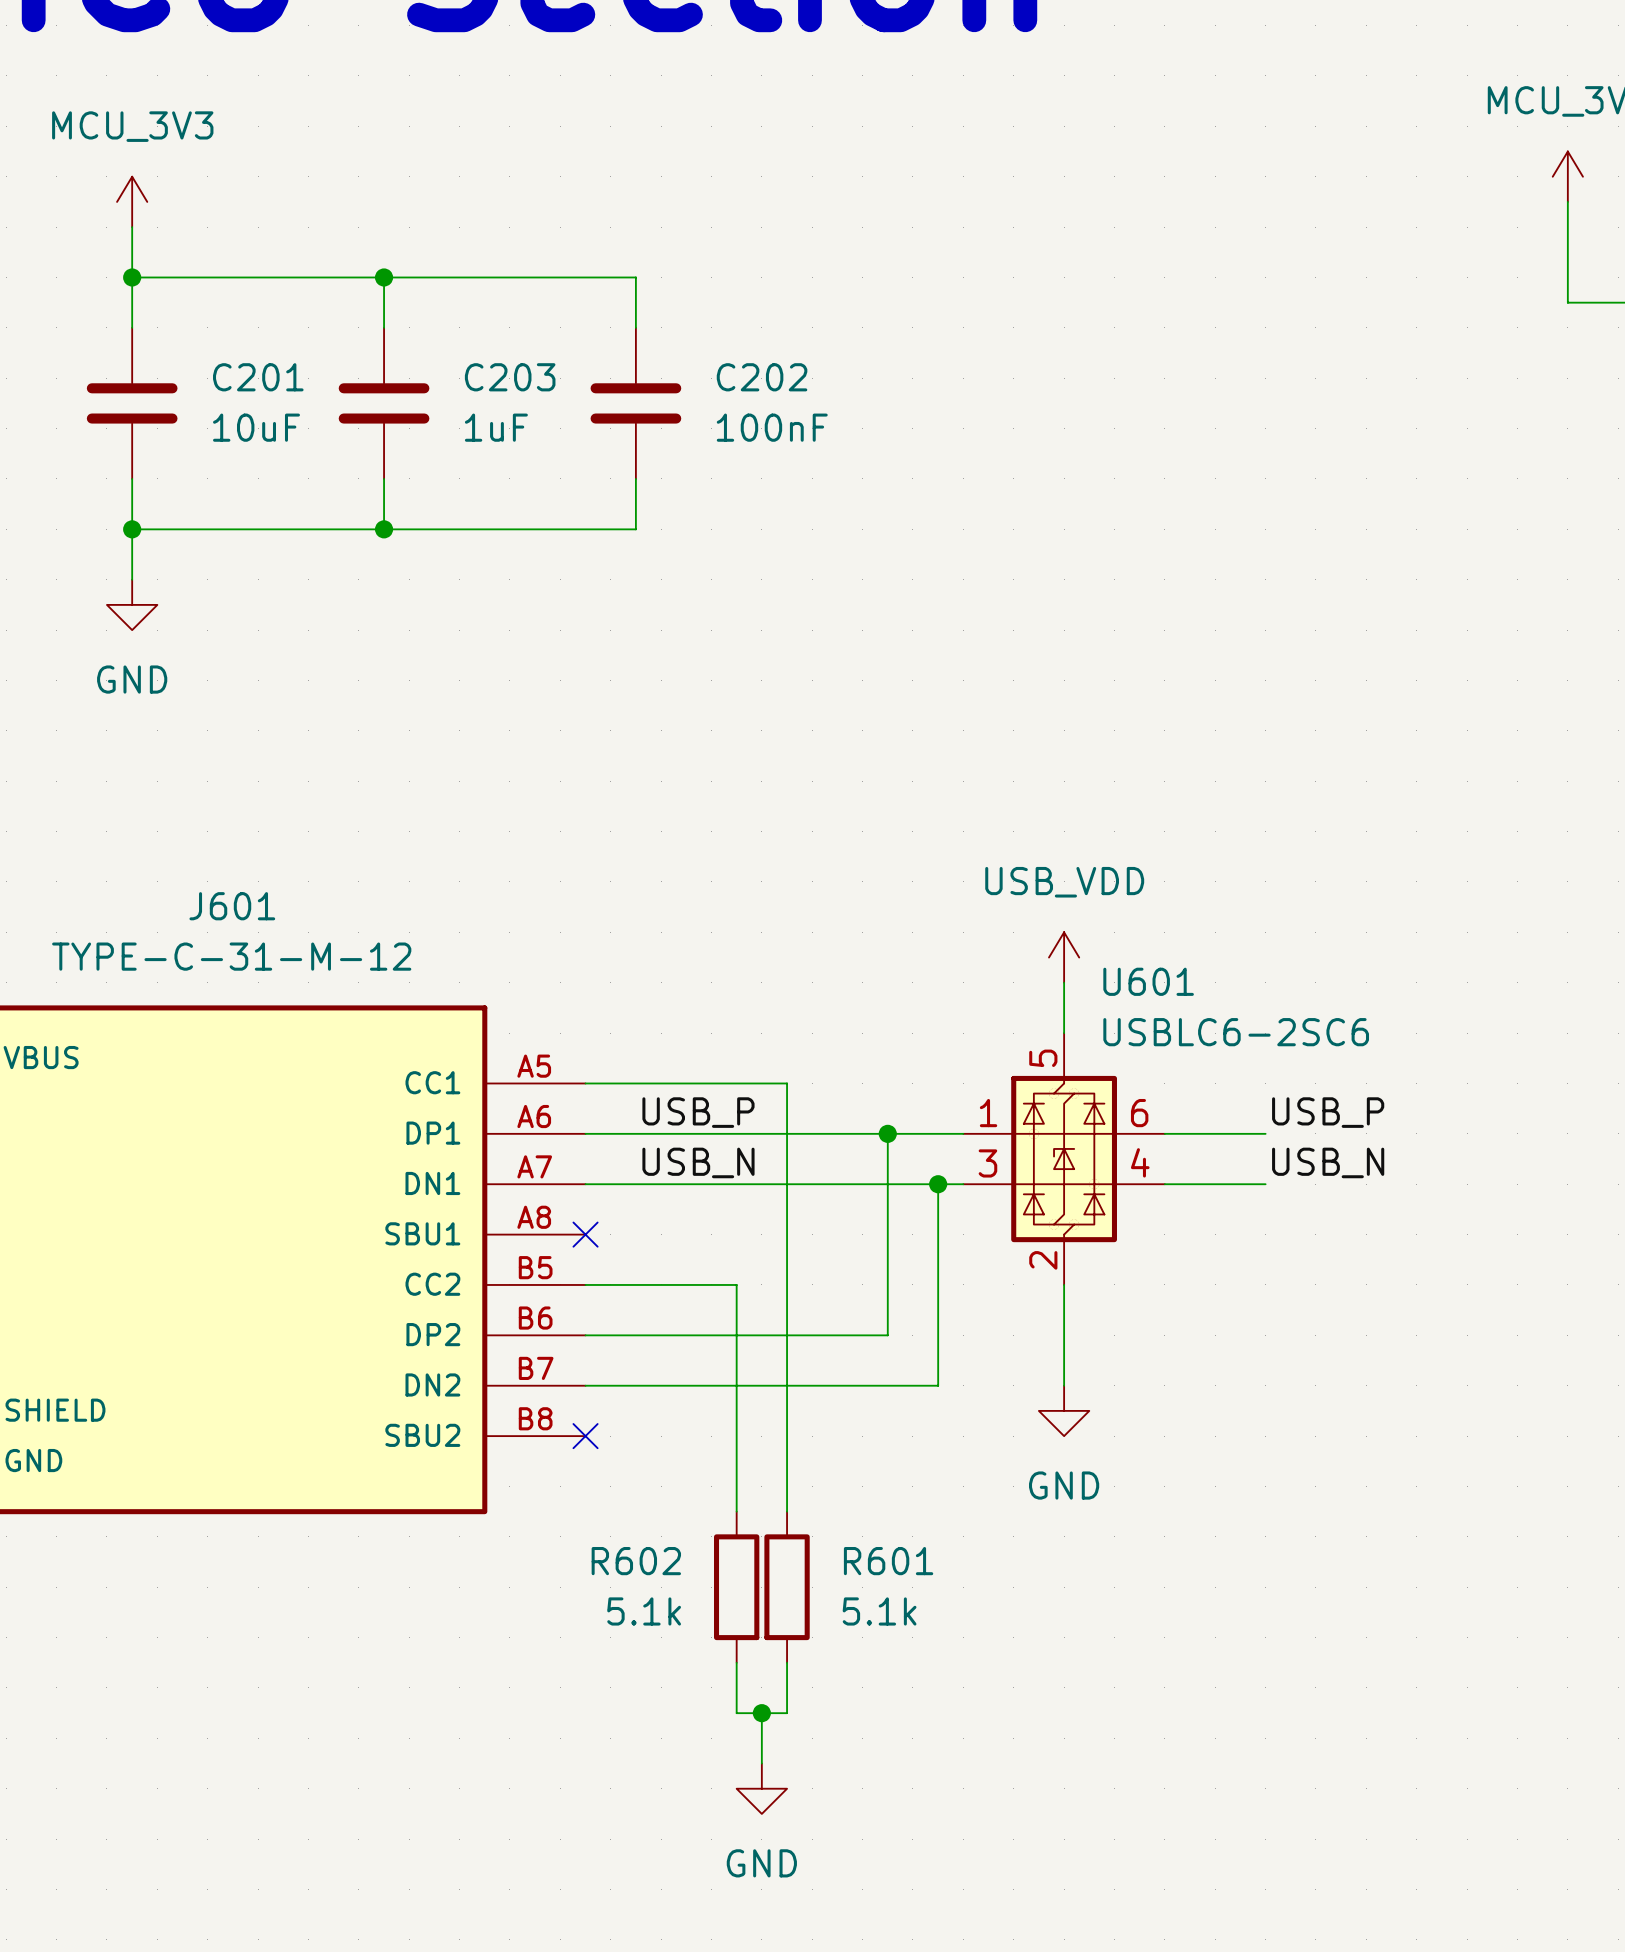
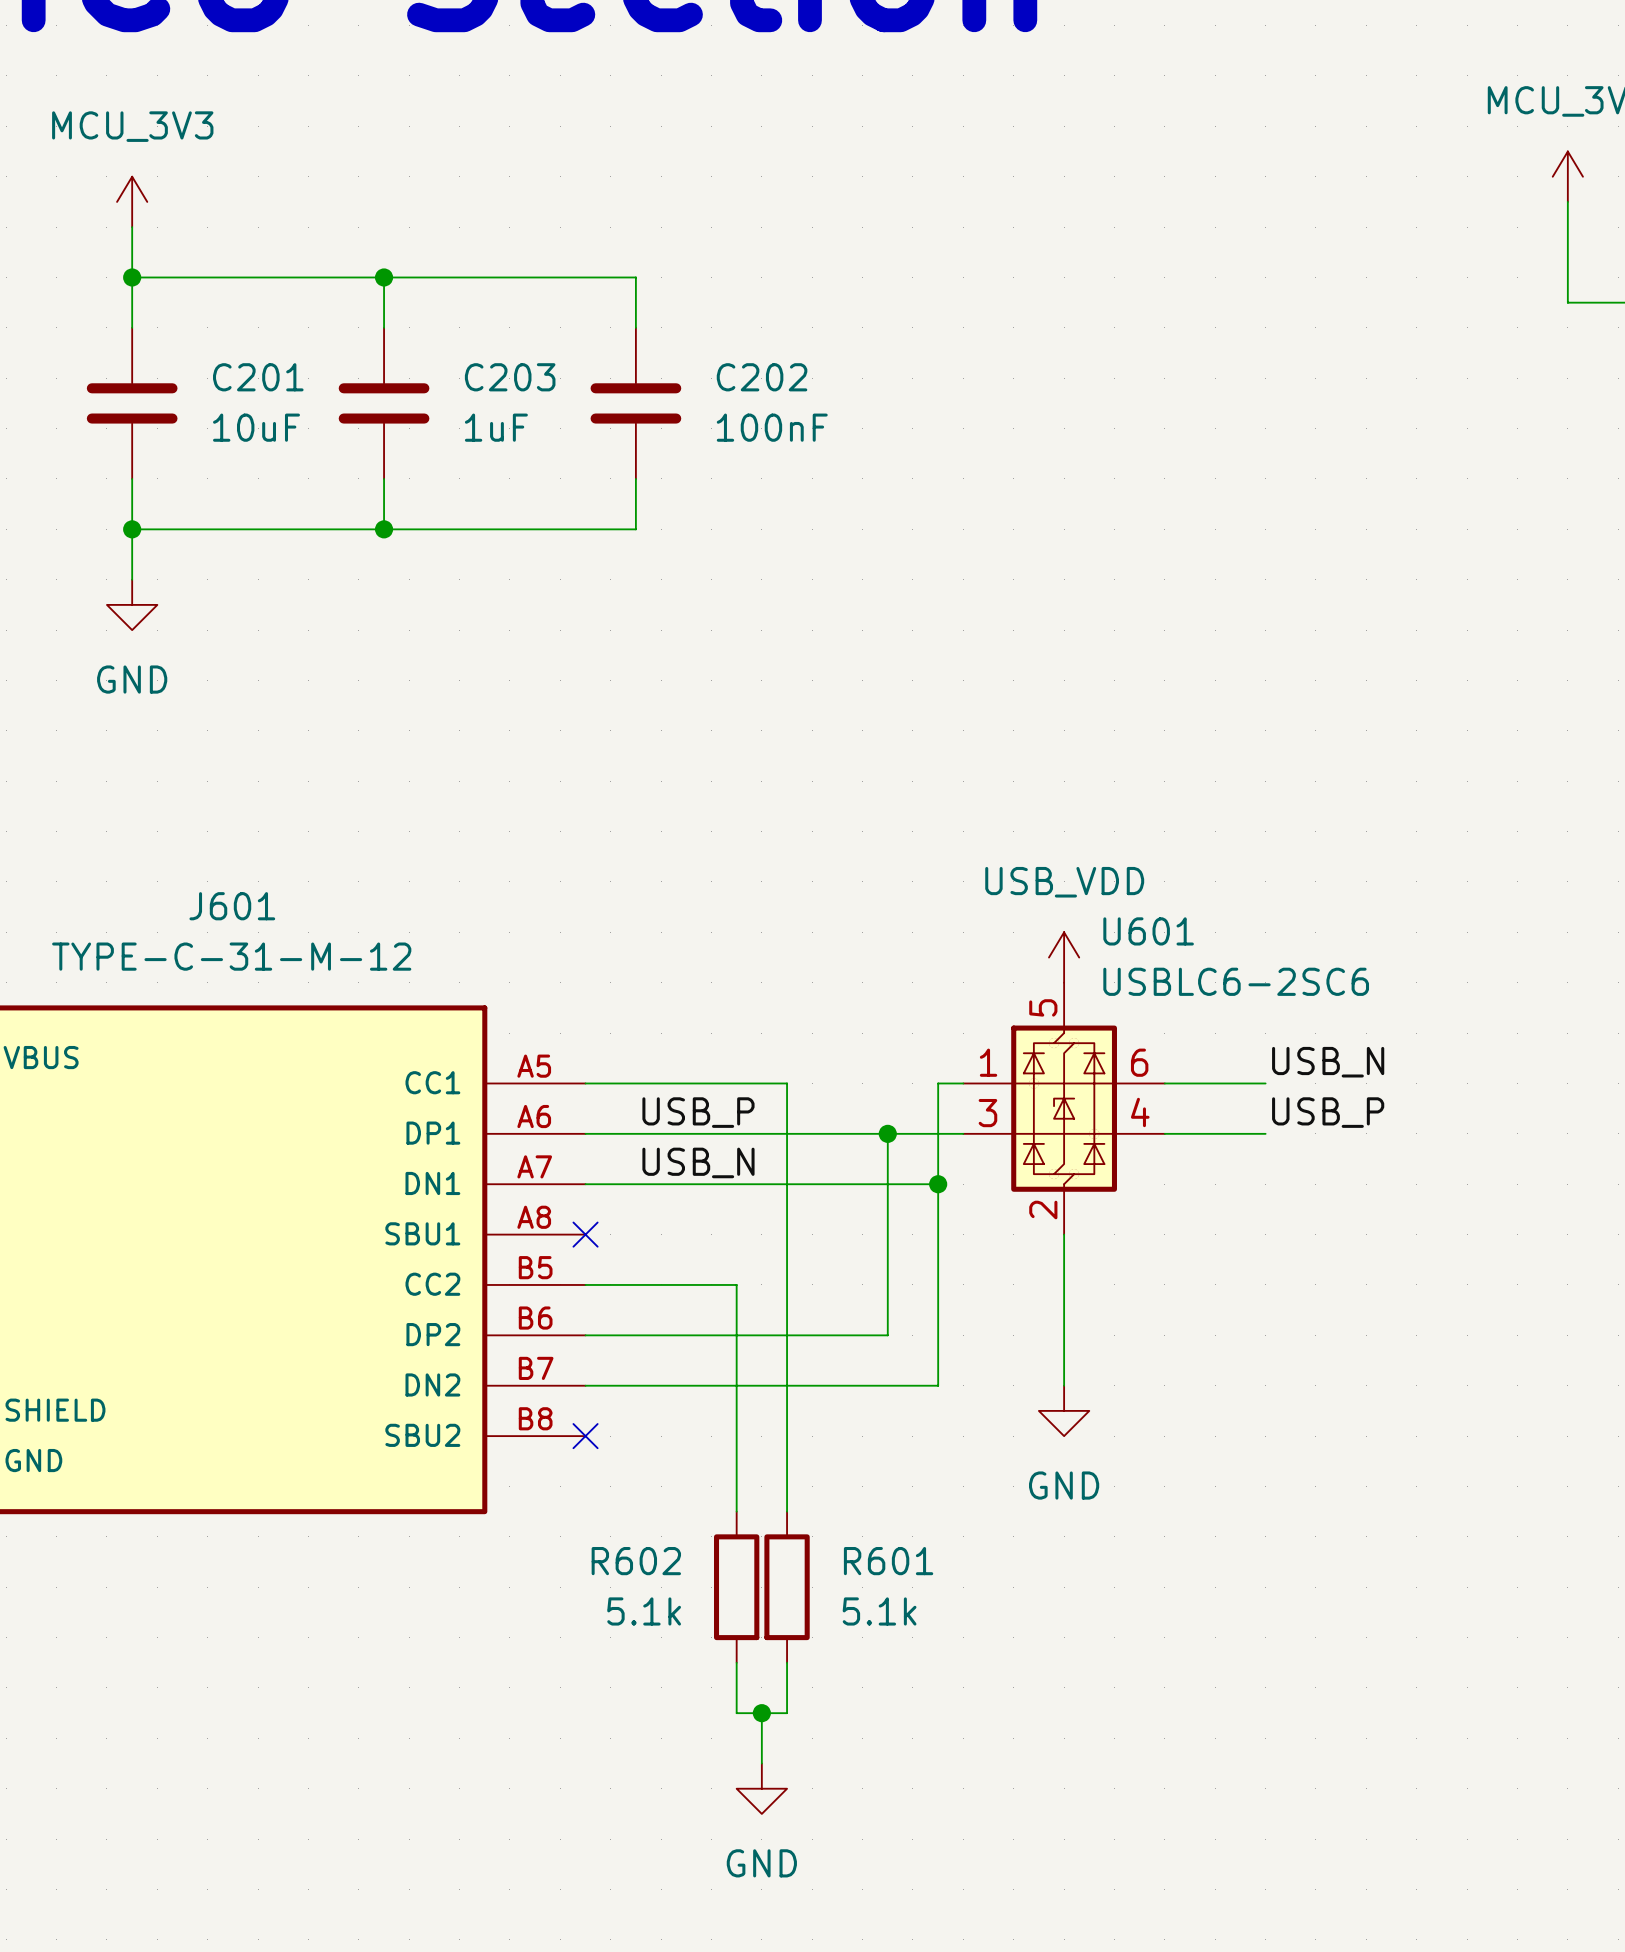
U601 position: (1064, 1159) -> (1064, 1108)
label position: USB_N (1328, 1162) -> USB_N (1328, 1062)
wire: (938, 1184) (963, 1184) -> (938, 1184) (938, 1083) (963, 1083)
wire: (1164, 1184) (1265, 1184) -> (1164, 1083) (1265, 1083)

